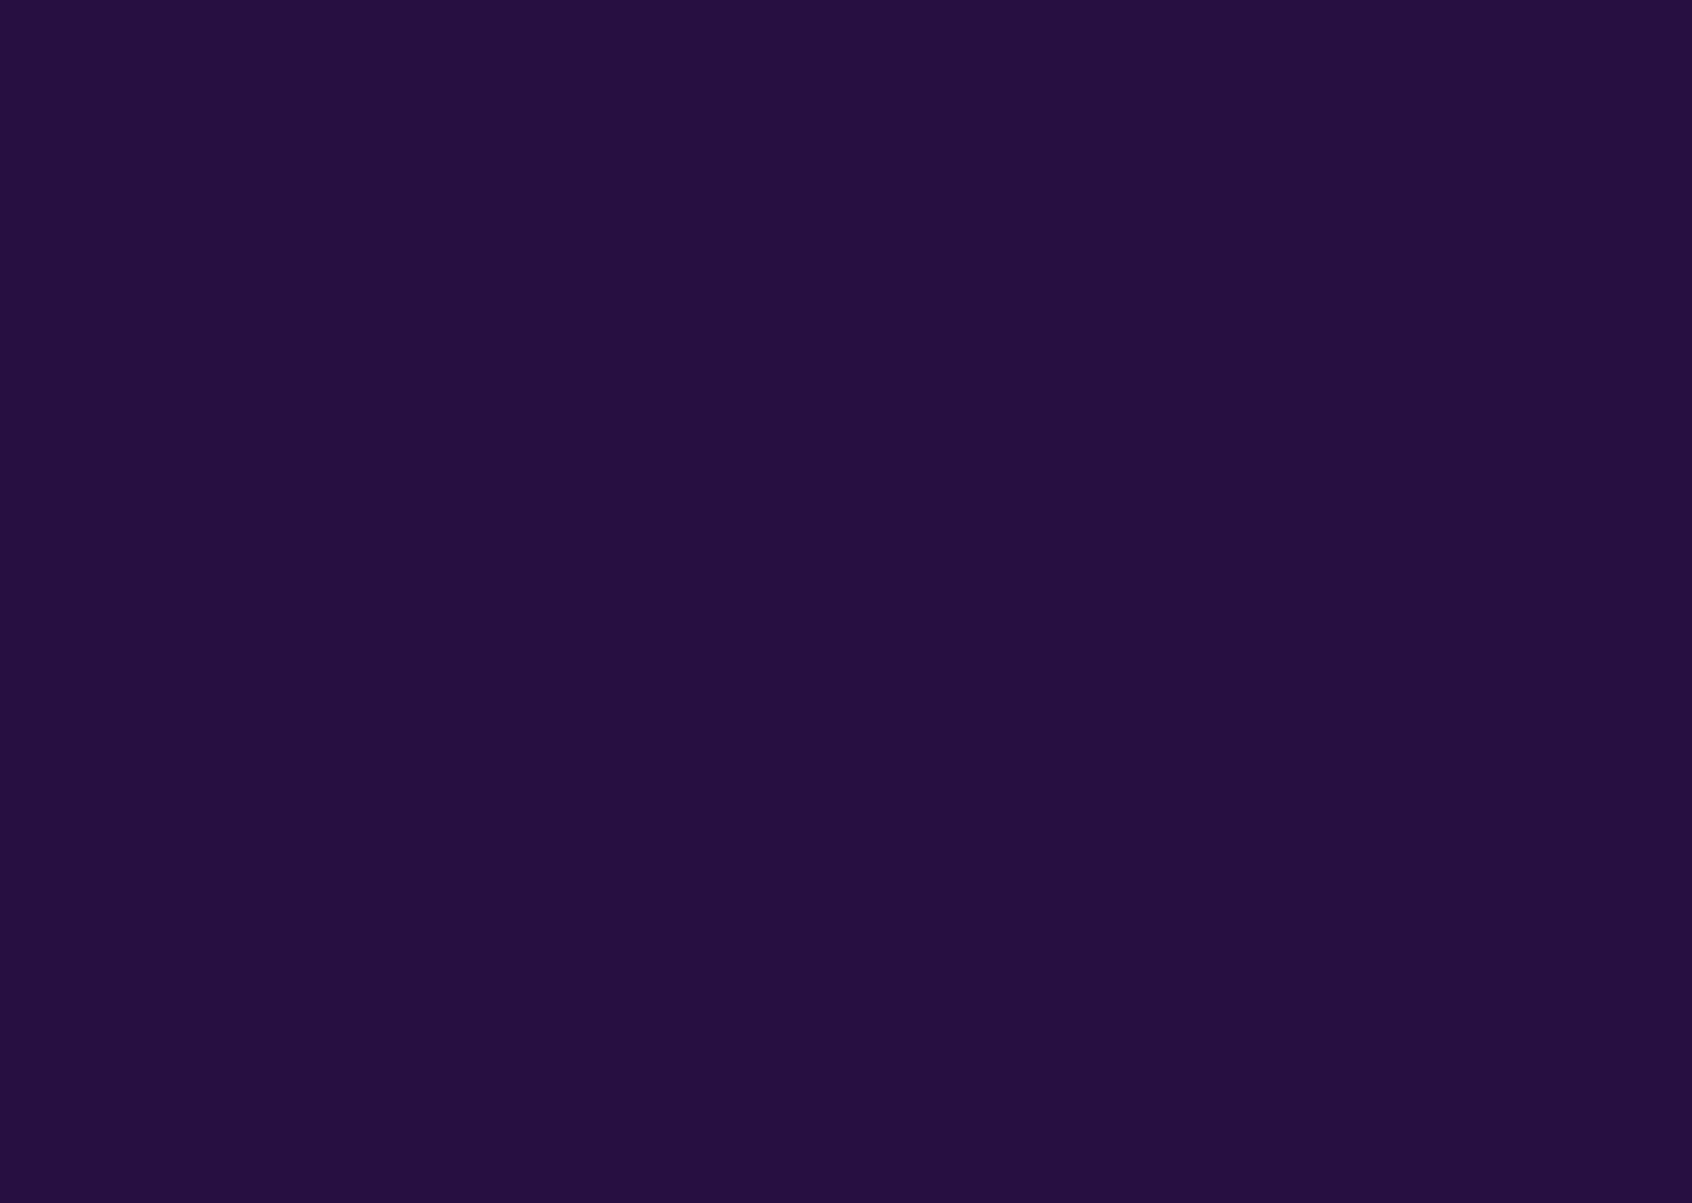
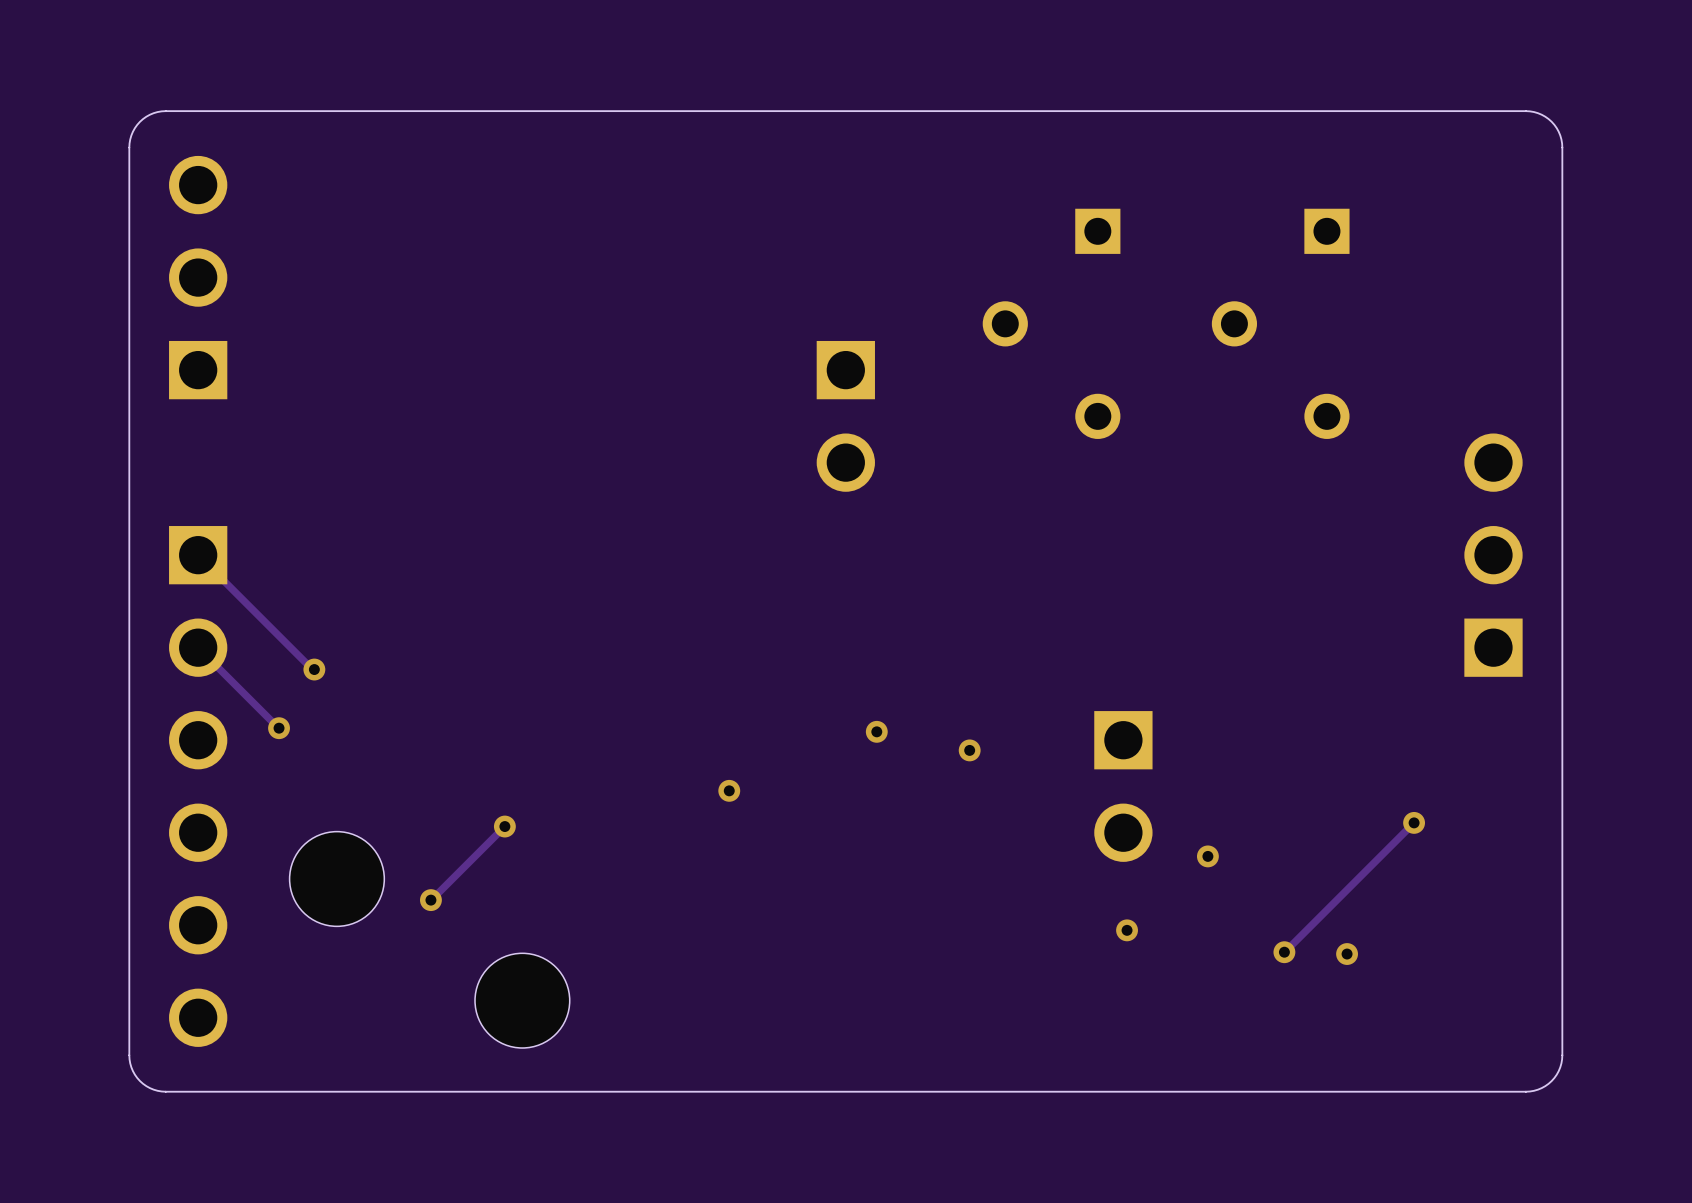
board edge: none -> (1525, 111) (165, 111) (146, 116) (134, 128) (129, 147) (129, 1055) (134, 1074) (149, 1088) (165, 1091) (1525, 1091) (1545, 1086) (1556, 1074) (1562, 1055) (1562, 147) (1558, 131) (1551, 121) (1541, 114) (1525, 111)
part: none -> (198, 277)
part: none -> (1051, 323)
part: none -> (1280, 323)
part: none -> (845, 416)
track: none -> (198, 555) (314, 669)
part: none -> (1493, 555)
track: none -> (198, 647) (278, 728)
via: none -> (314, 669)
via: none -> (279, 728)
via: none -> (876, 731)
via: none -> (969, 750)
part: none -> (198, 786)
part: none -> (1123, 786)
via: none -> (729, 790)
track: none -> (1414, 822) (1284, 952)
via: none -> (1414, 822)
track: none -> (504, 826) (431, 900)
via: none -> (504, 826)
via: none -> (1207, 856)
part: none -> (336, 878)
via: none -> (430, 900)
via: none -> (1127, 930)
via: none -> (1284, 952)
via: none -> (1347, 954)
part: none -> (522, 1000)

